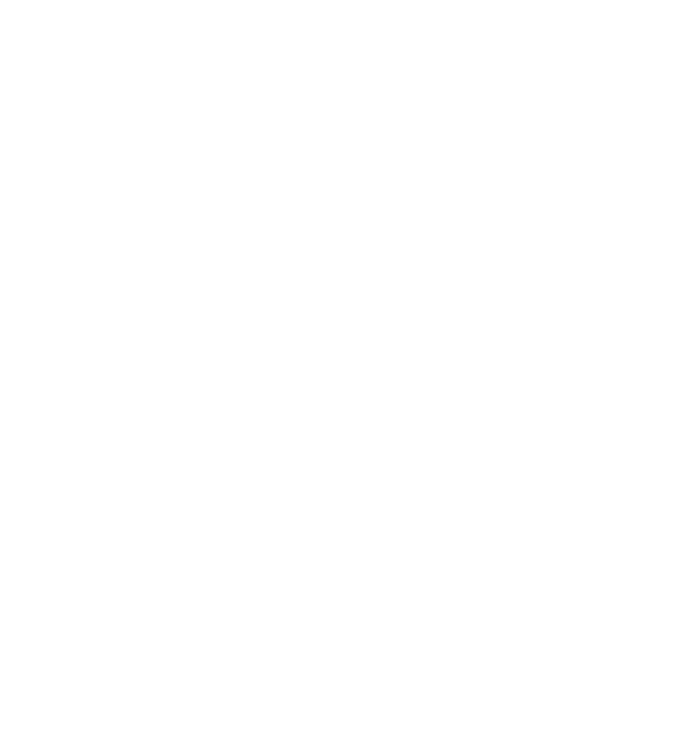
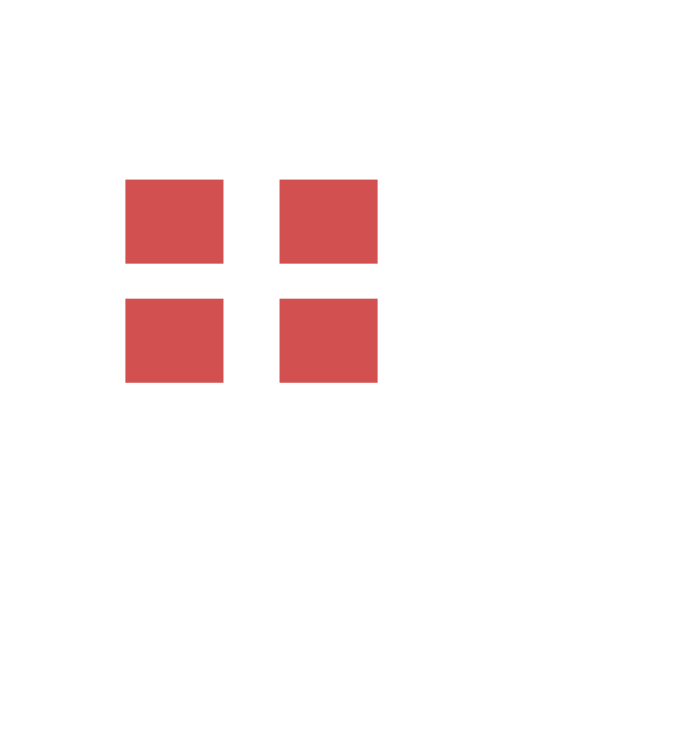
part: none -> (251, 281)

